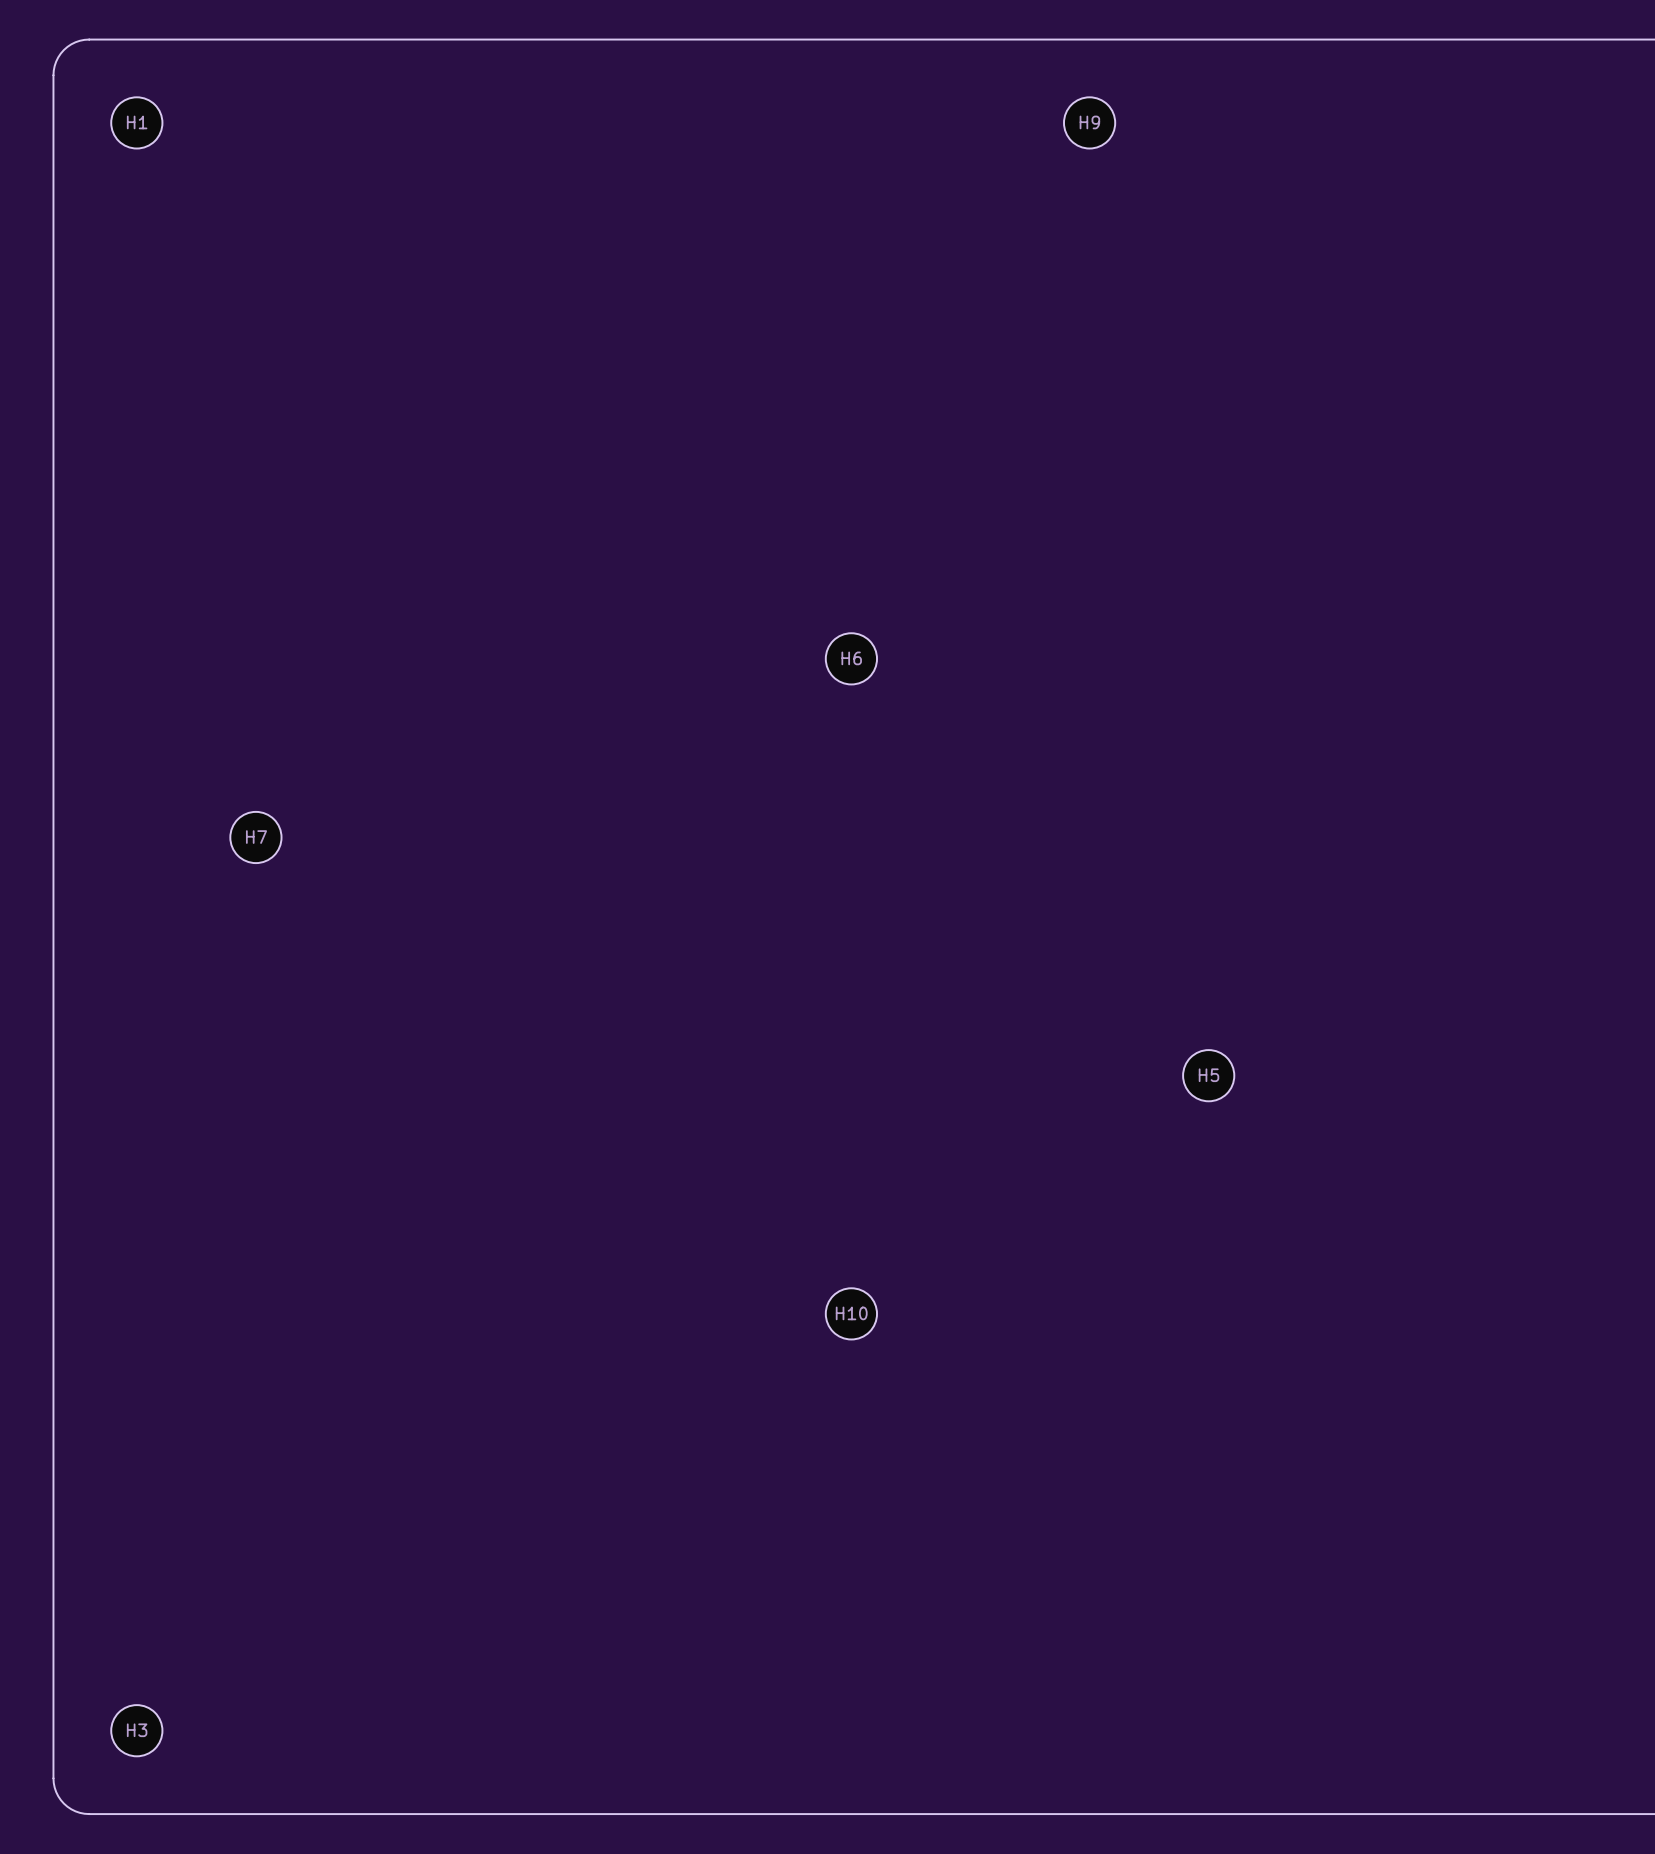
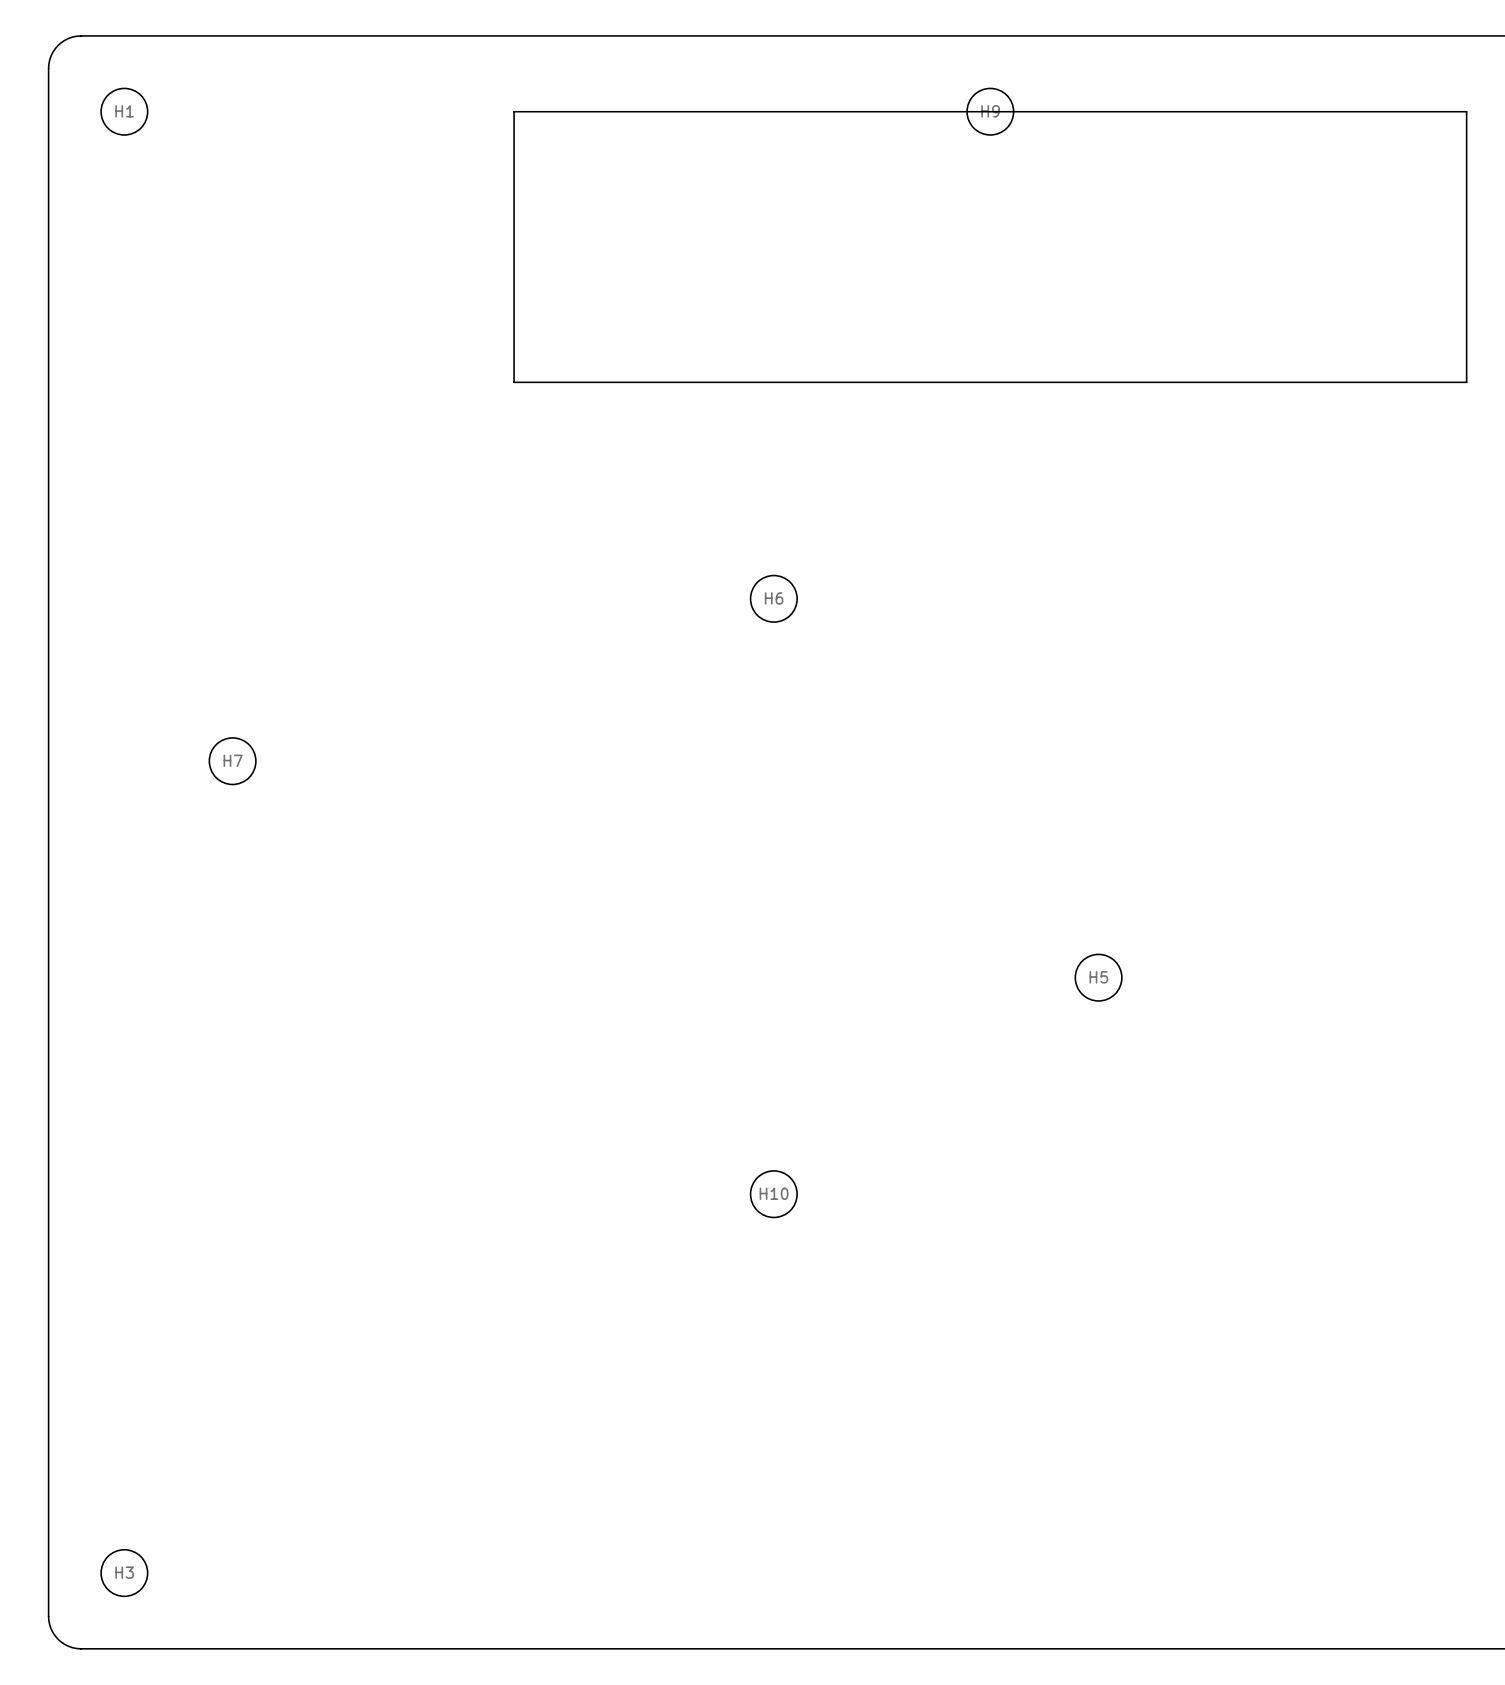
board edge: none -> (514, 111) (514, 382) (1466, 382) (1466, 111) (514, 111)

